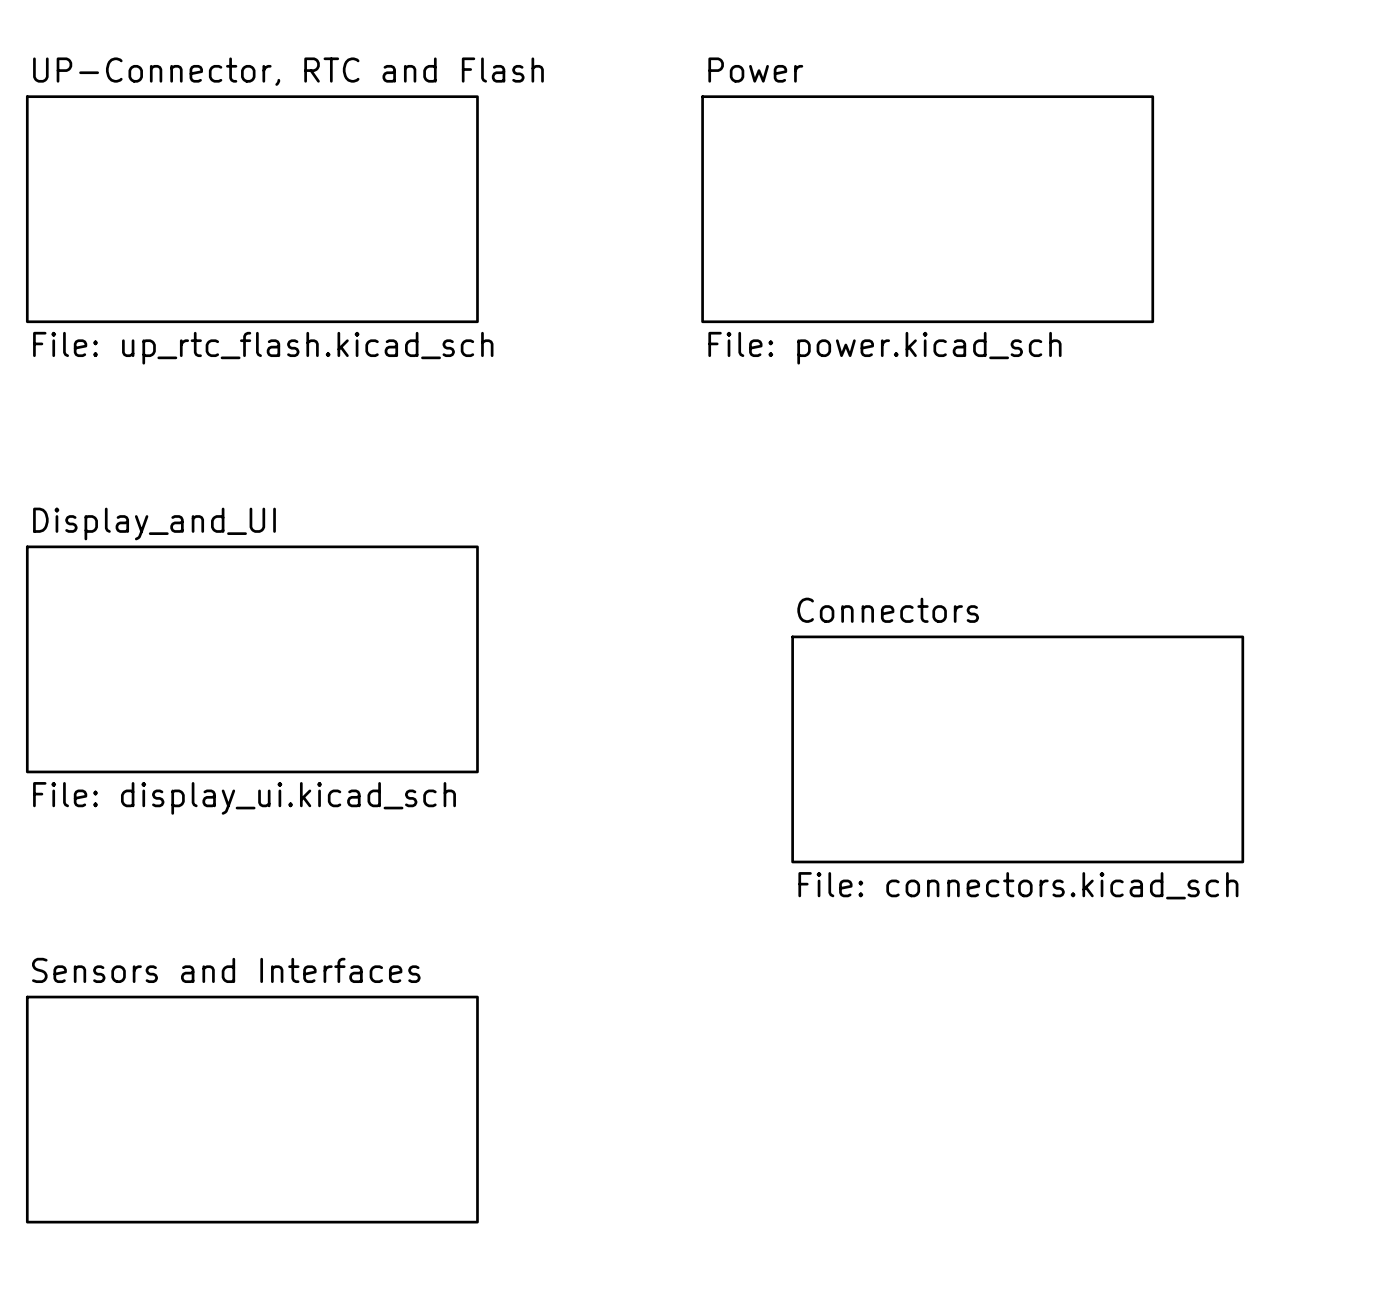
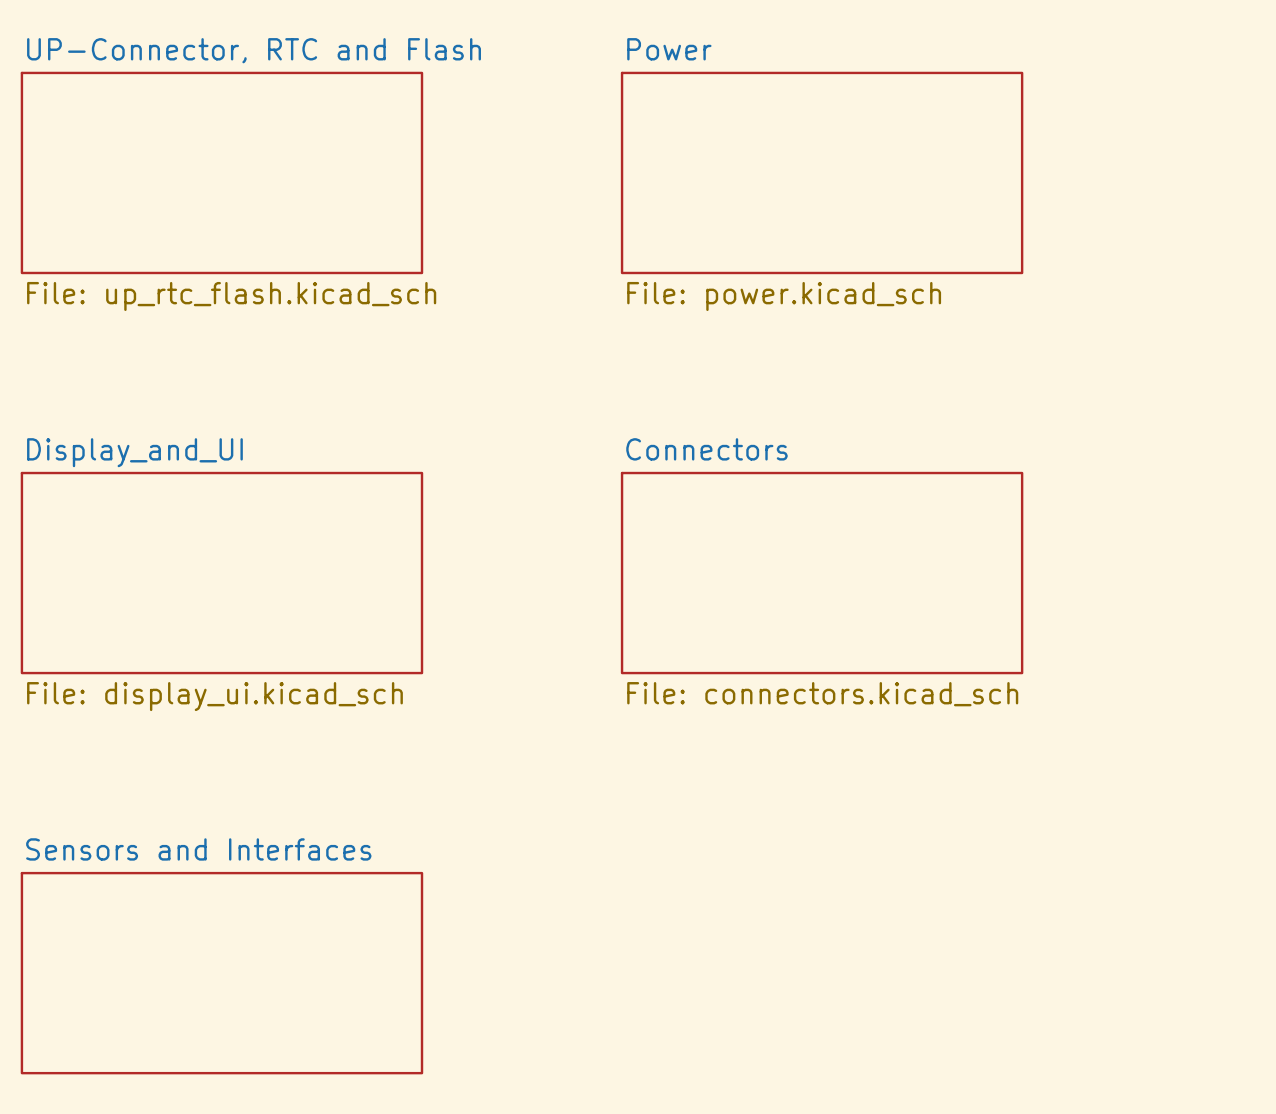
sheet Connectors position: (1017, 749) -> (822, 573)

